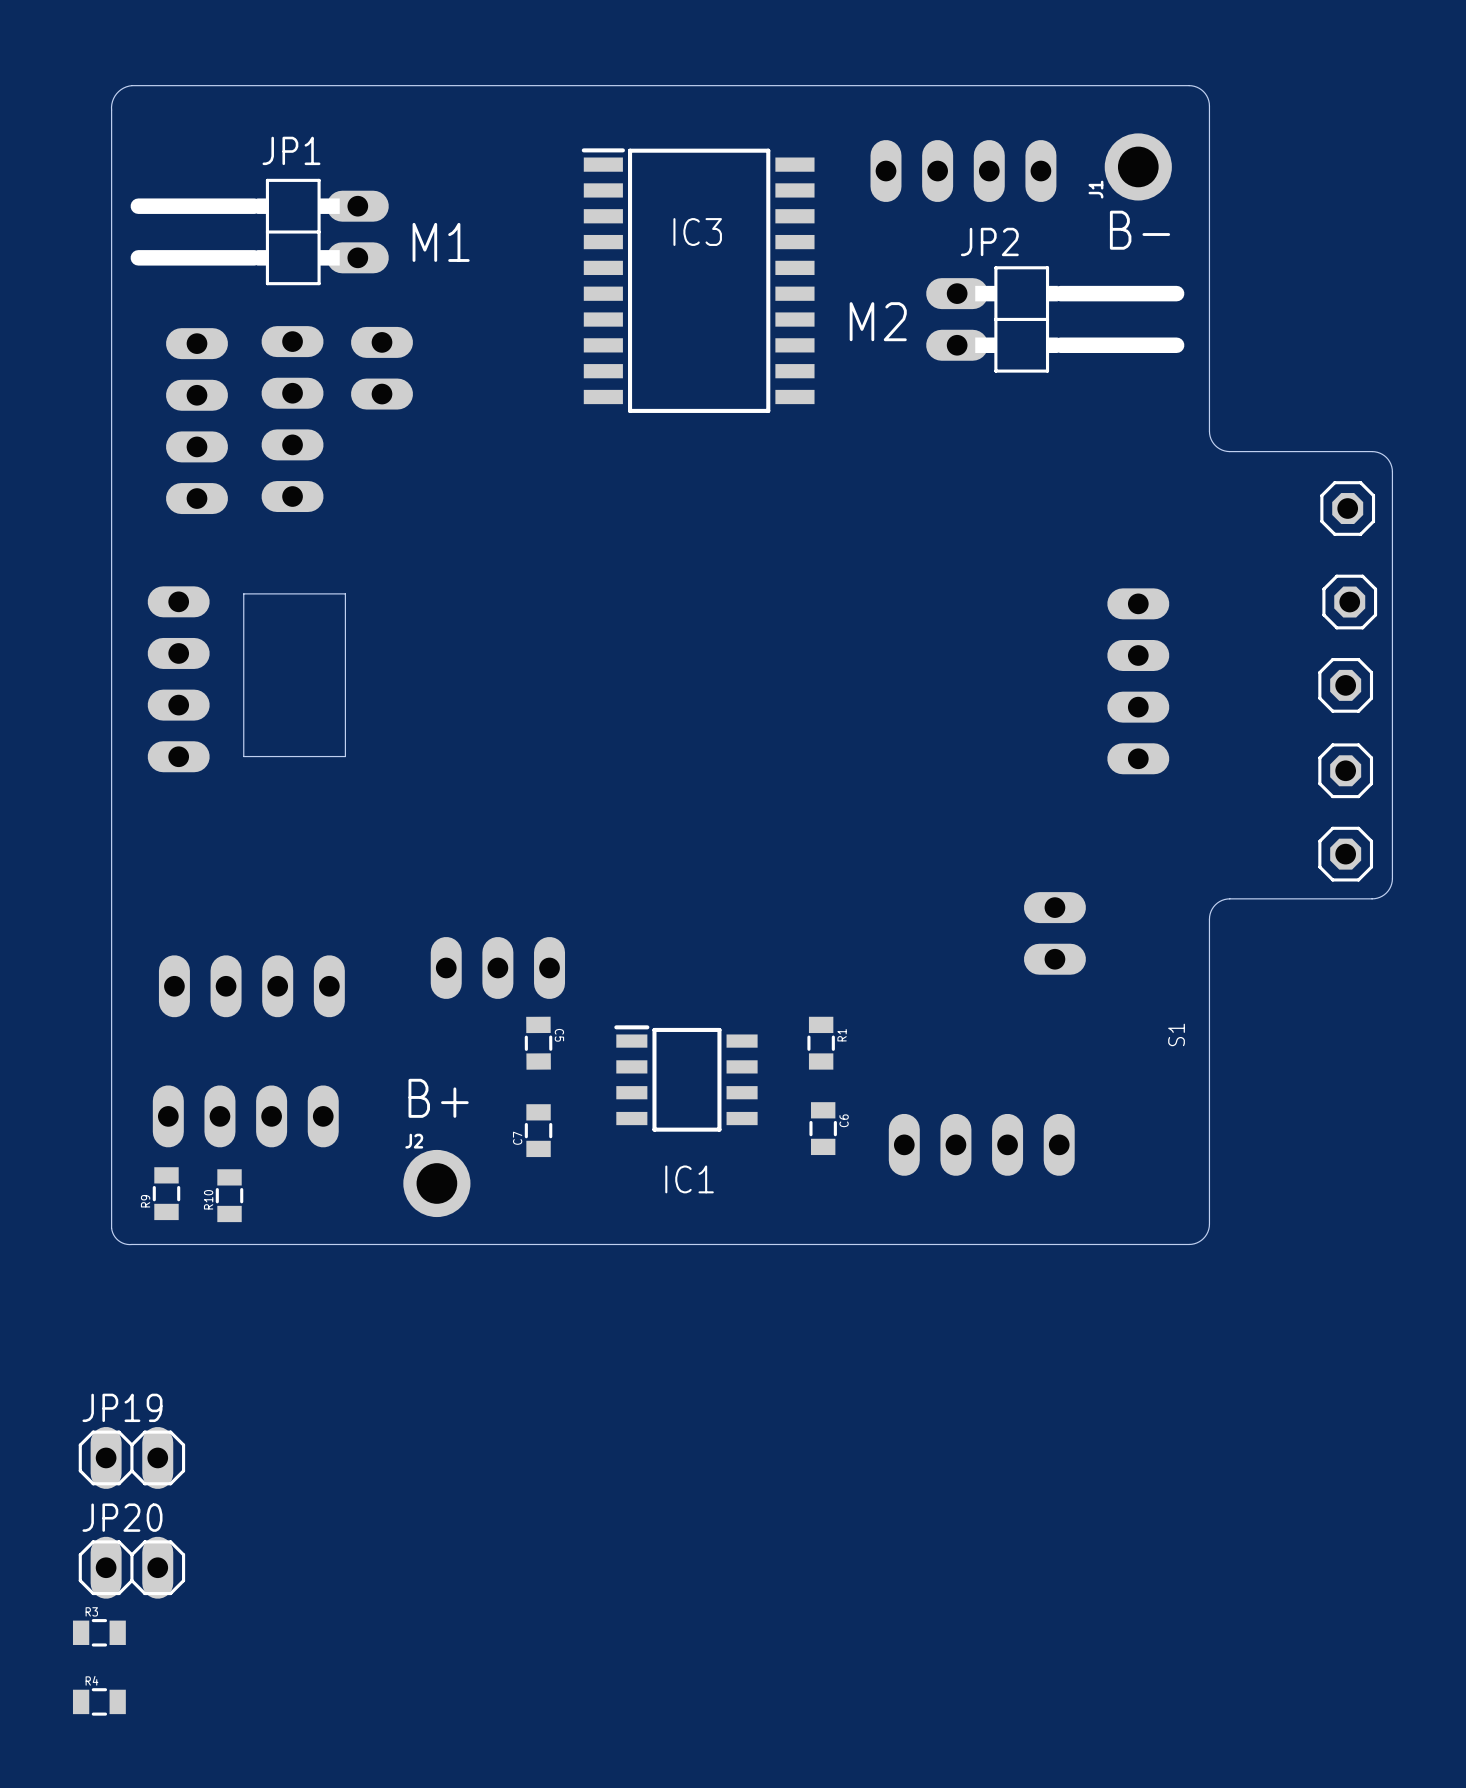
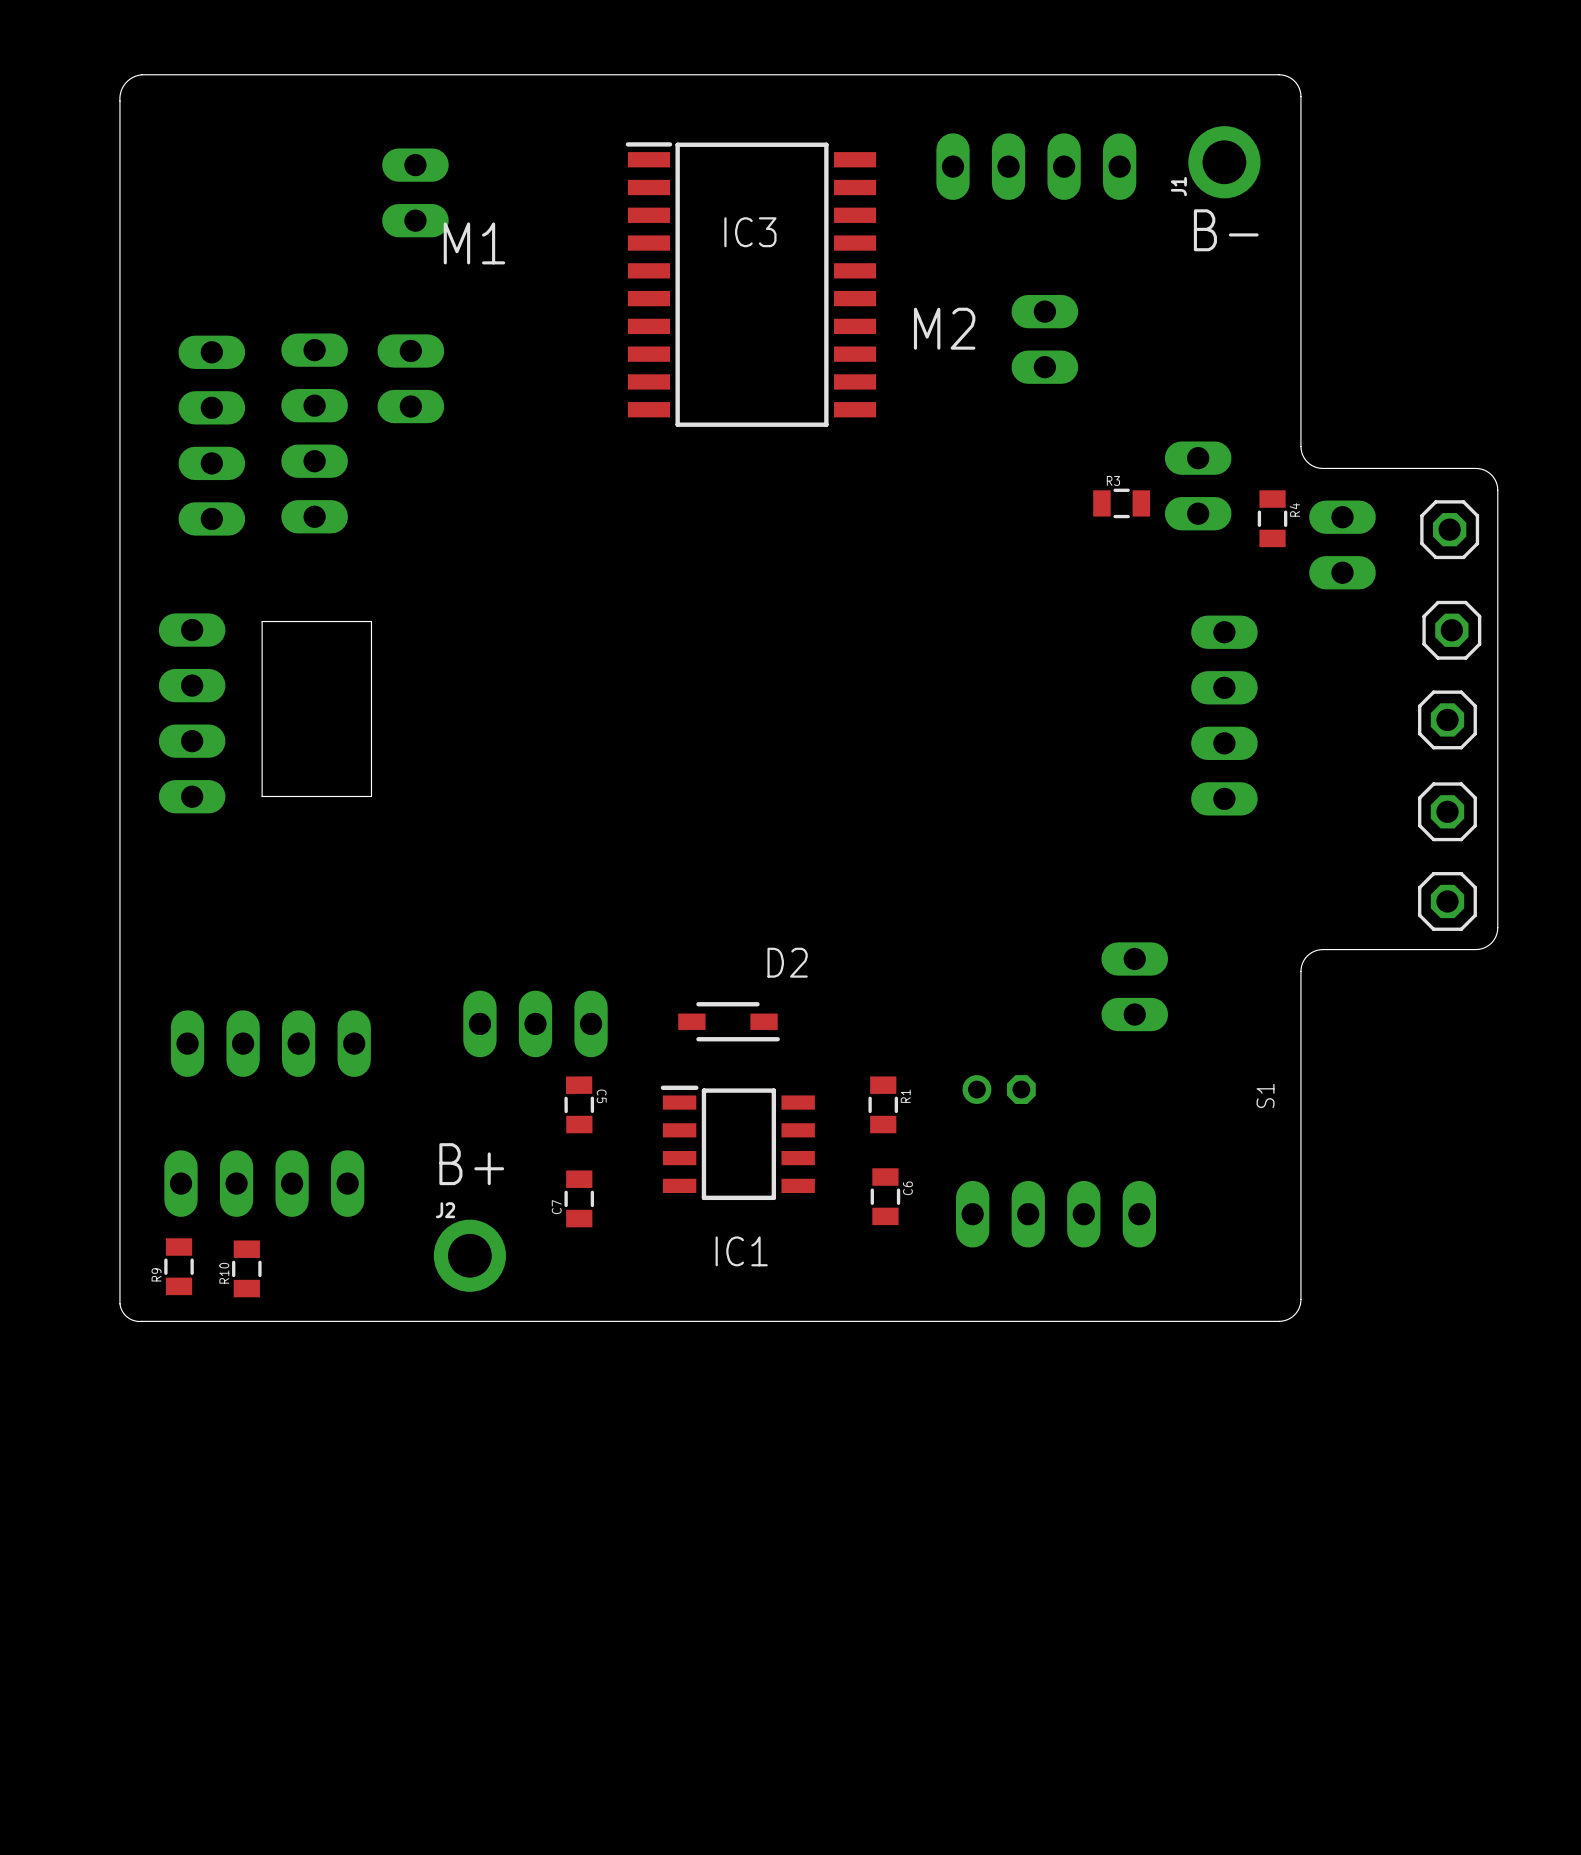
JP1 side: top (259, 232) -> bottom (415, 192)
JP2 side: top (1055, 319) -> bottom (1044, 339)
part: none -> (1198, 485)
part: none -> (1342, 544)
D2: none -> (729, 1021)
part: none -> (999, 1089)
JP19: (131, 1457) -> none
JP20: (131, 1567) -> none
R3 position: (99, 1632) -> (1121, 503)
R4 rotation: 0° (99, 1701) -> 90° clockwise (1272, 518)
R4 position: (99, 1701) -> (1272, 518)

